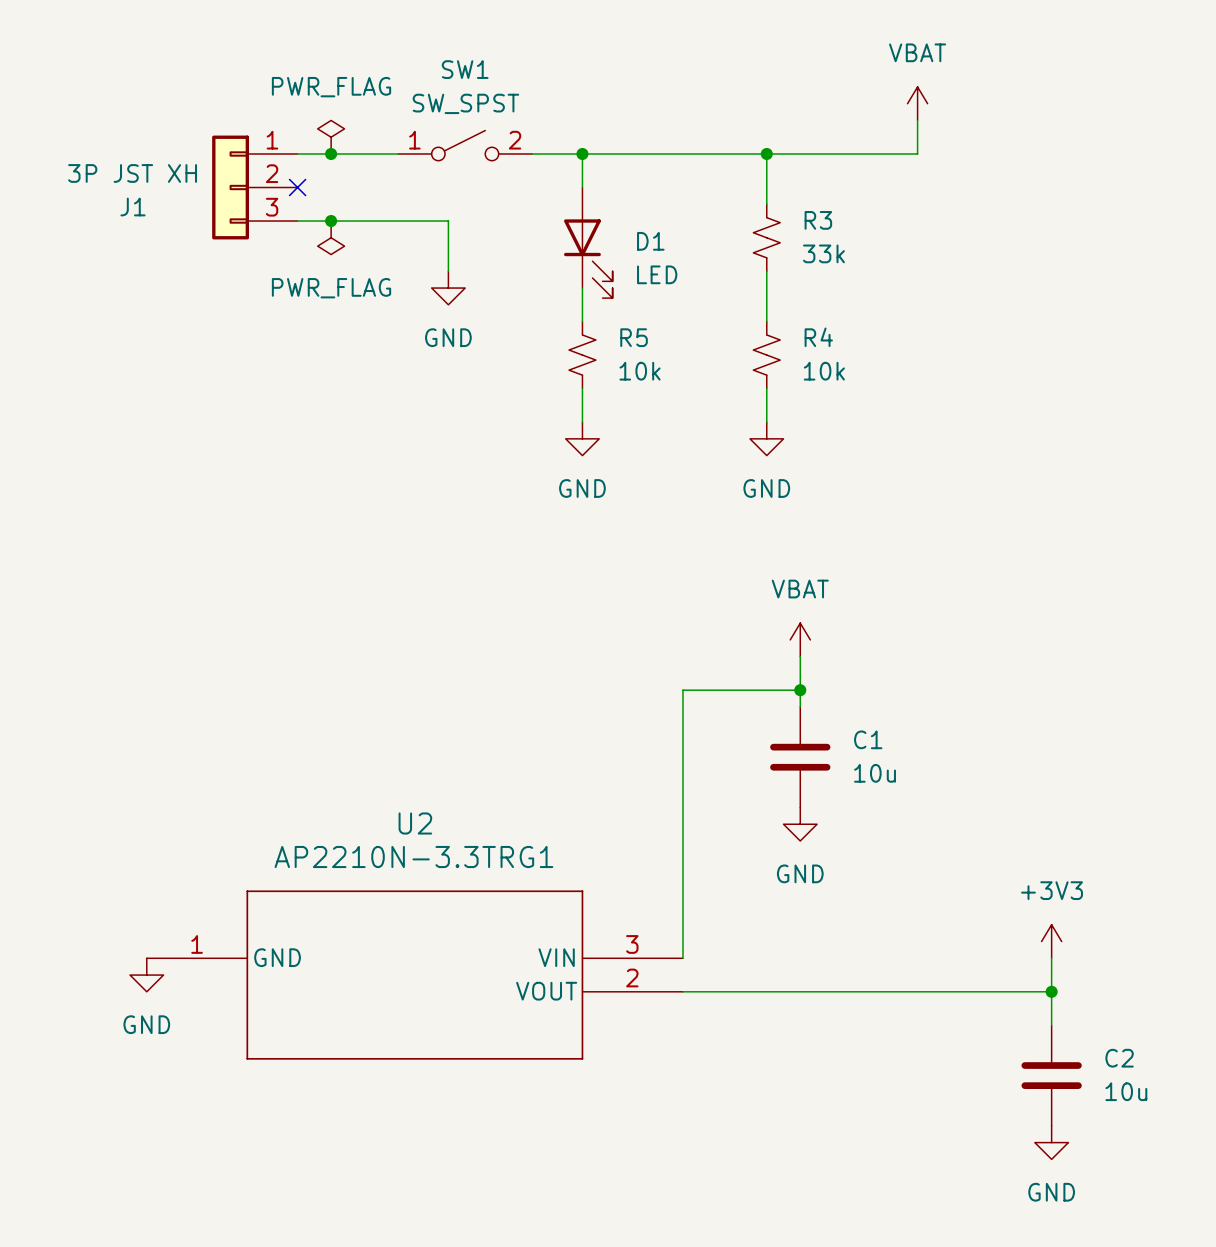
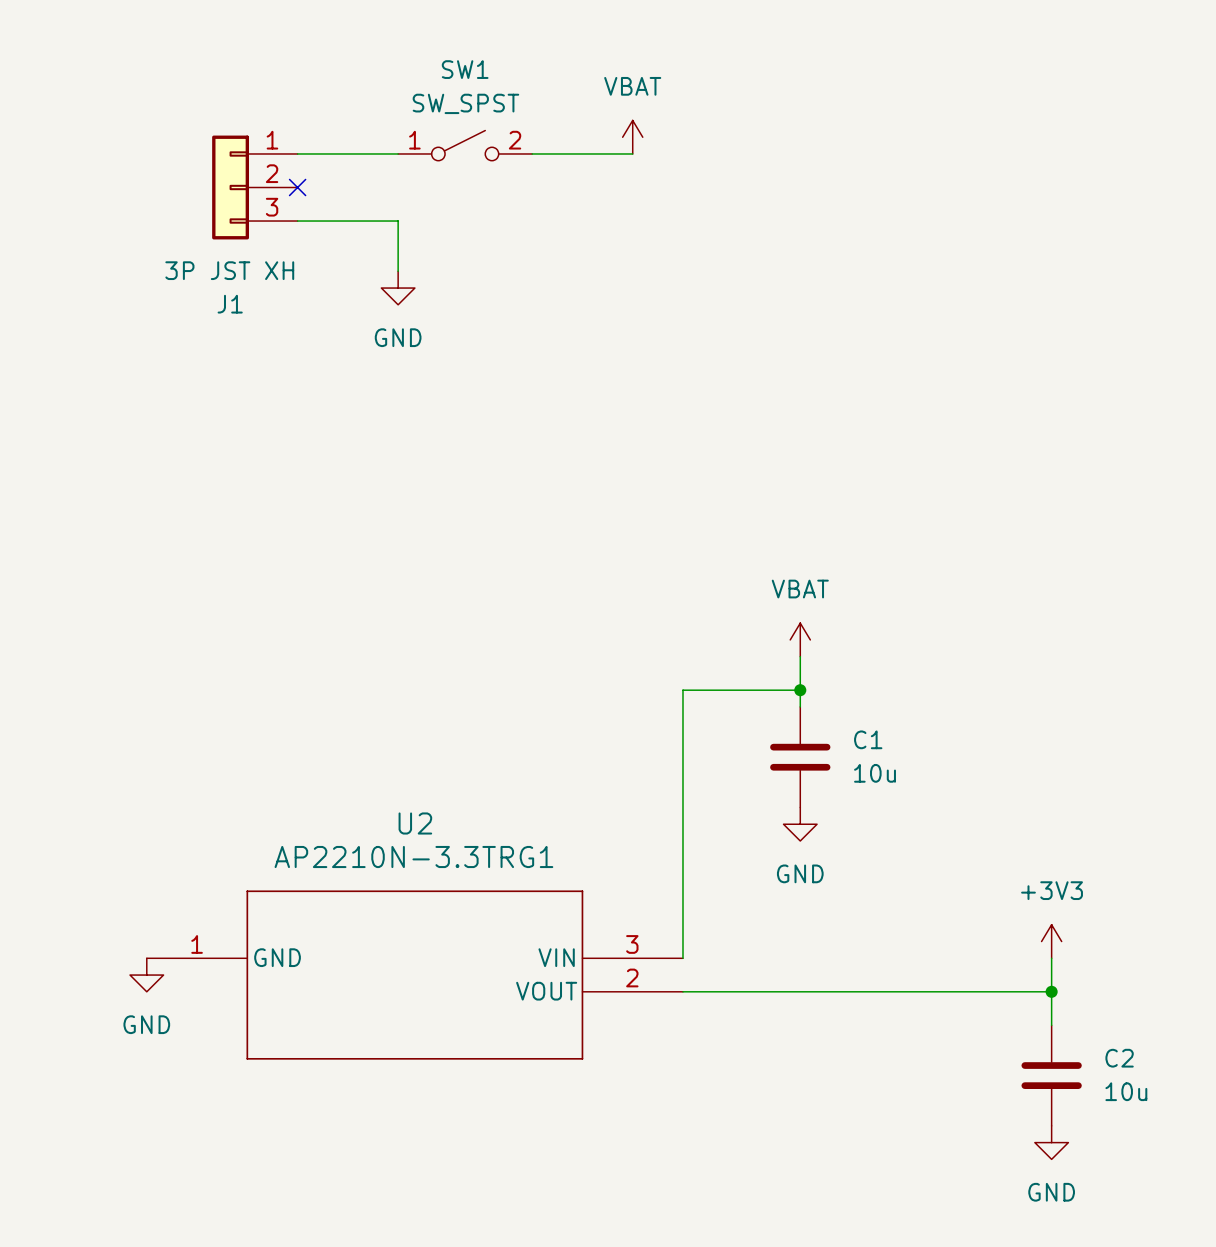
power symbol position: VBAT (917, 103) -> VBAT (632, 137)
wire: (917, 120) (917, 153) (632, 153) -> none
power symbol: PWR_FLAG (331, 137) -> none
junction: (331, 153) -> none
wire: (582, 153) (582, 187) -> none
junction: (582, 153) -> none
wire: (766, 153) (766, 204) -> none
junction: (766, 153) -> none
J1 value position: 3P JST XH (132, 173) -> 3P JST XH (229, 270)
J1 name position: J1 (132, 206) -> J1 (230, 304)
junction: (331, 221) -> none
wire: (398, 221) (448, 221) (448, 271) -> (398, 221) (398, 271)
power symbol: PWR_FLAG (331, 237) -> none
R3: 33k (766, 237) -> none
D1: LED (588, 242) -> none
wire: (766, 271) (766, 321) -> none
power symbol position: GND (448, 288) -> GND (398, 288)
wire: (582, 288) (582, 321) -> none
R5: 10k (582, 355) -> none
R4: 10k (766, 355) -> none
wire: (582, 388) (582, 422) -> none
wire: (766, 388) (766, 422) -> none
power symbol: GND (582, 438) -> none
power symbol: GND (766, 438) -> none

